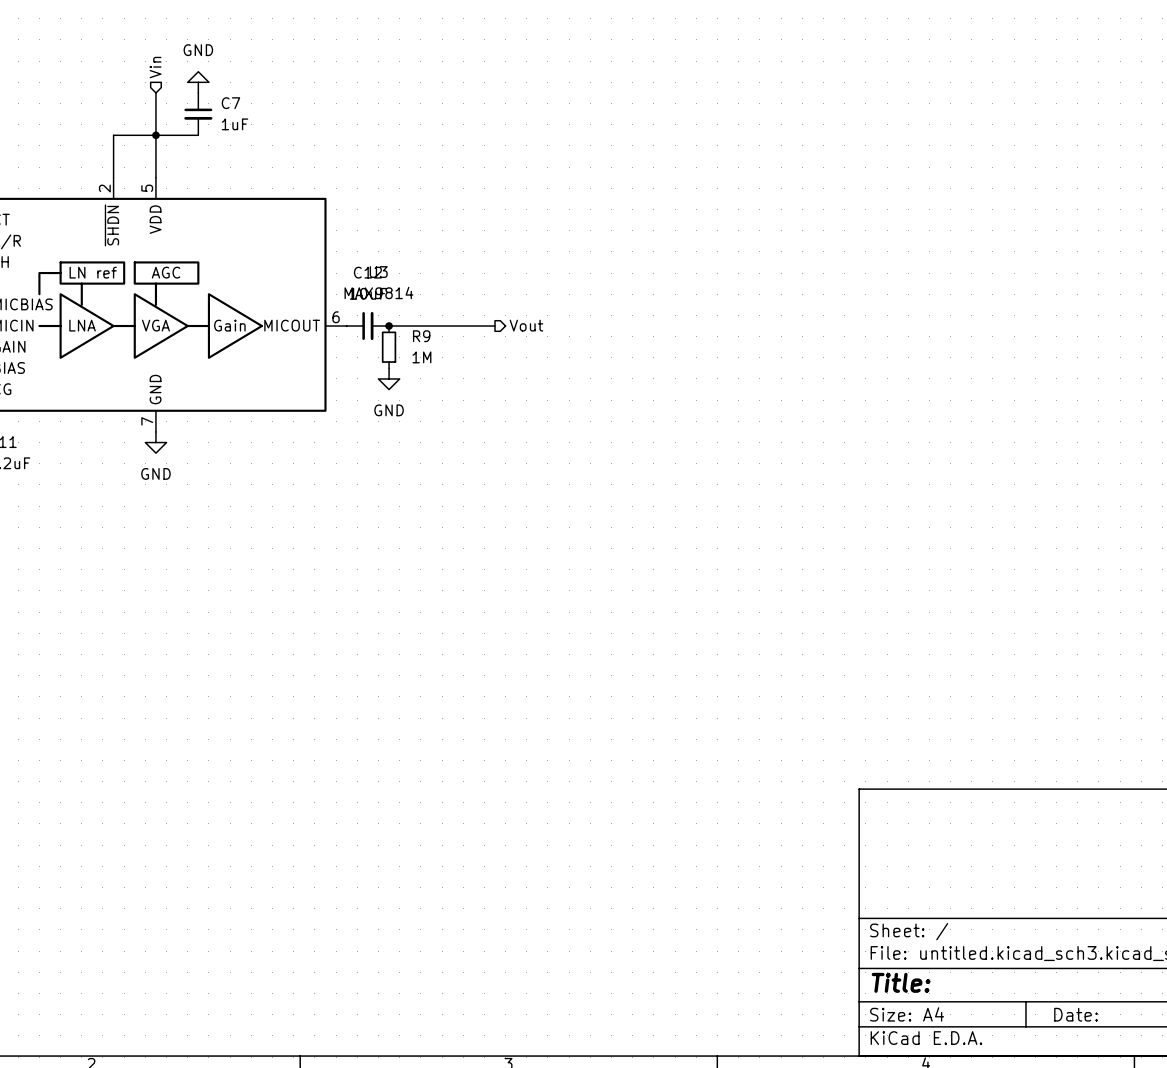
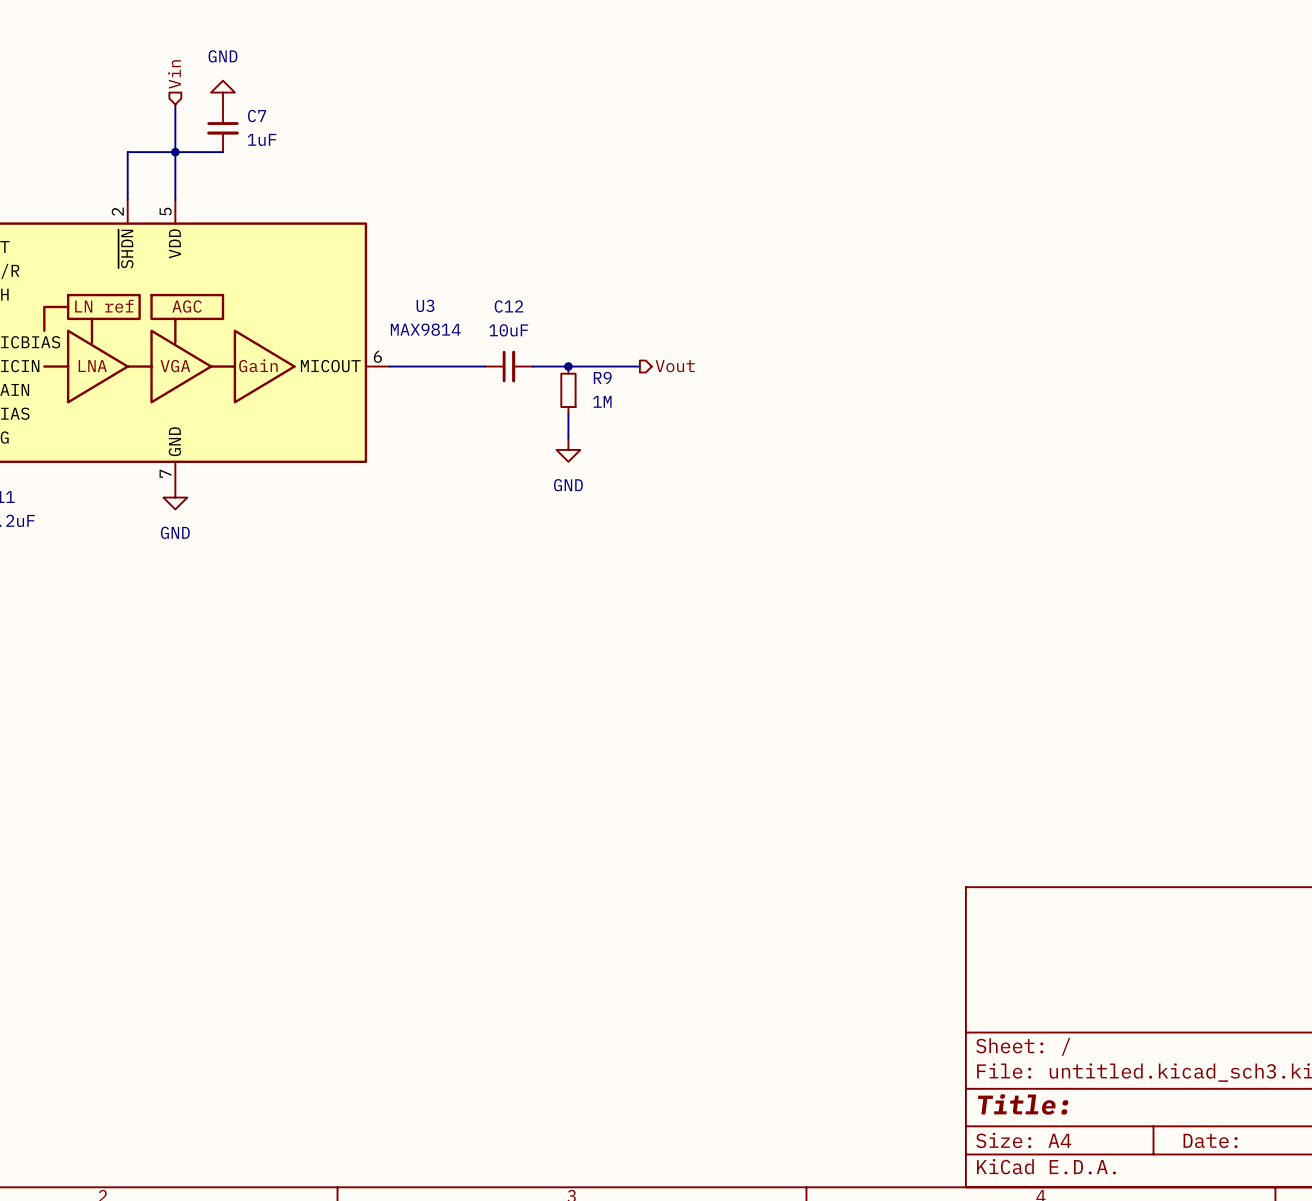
hierarchical label position: Vout (526, 325) -> Vout (675, 366)
C12 position: (367, 326) -> (508, 366)
junction: (389, 326) -> none
wire: none -> (556, 366) (639, 366)
junction: none -> (568, 366)
R9 position: (389, 347) -> (568, 390)
wire: none -> (568, 414) (568, 438)
power symbol position: GND (389, 378) -> GND (568, 449)

